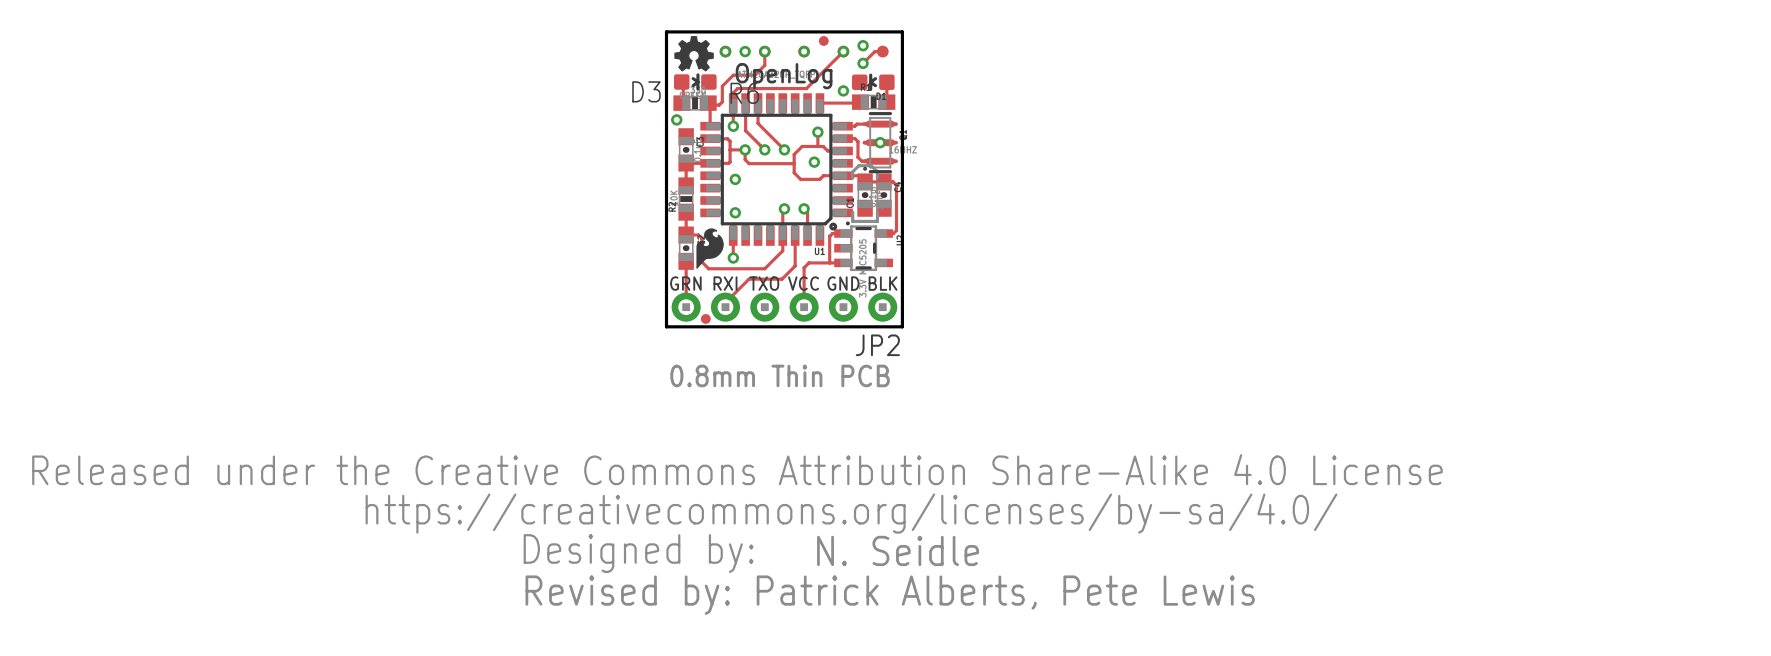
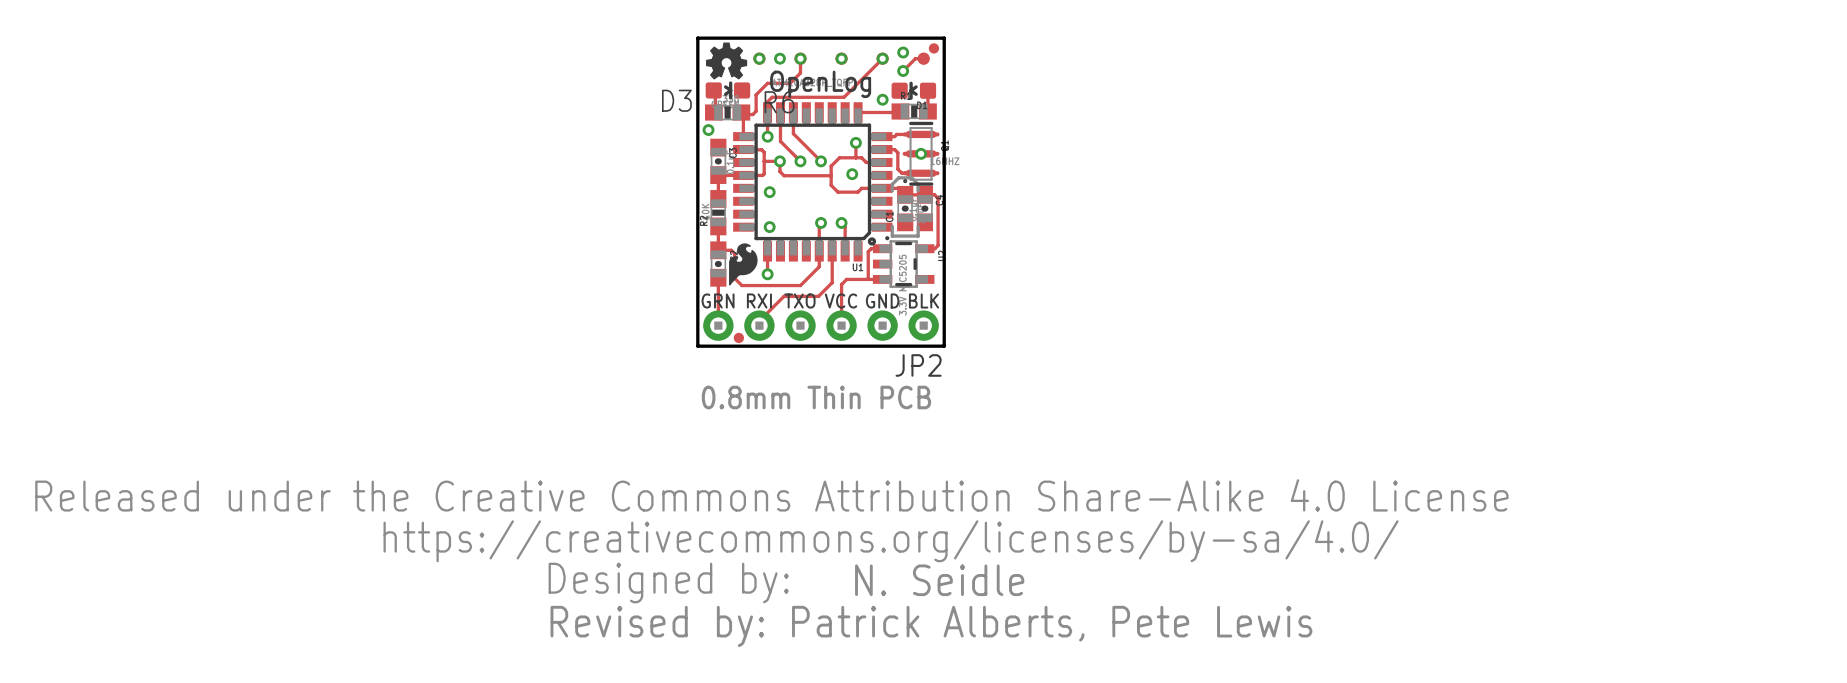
part position: (823, 40) -> (933, 48)

